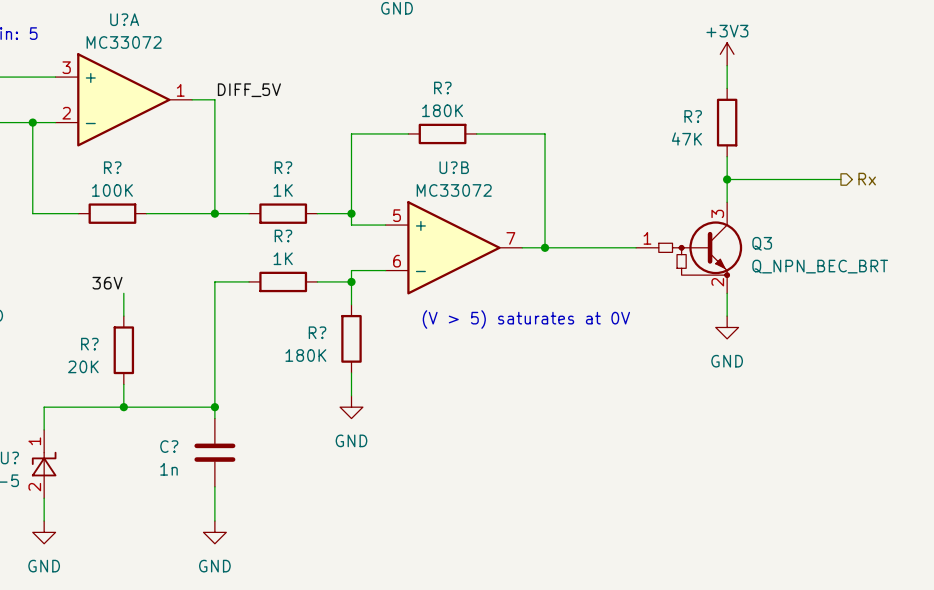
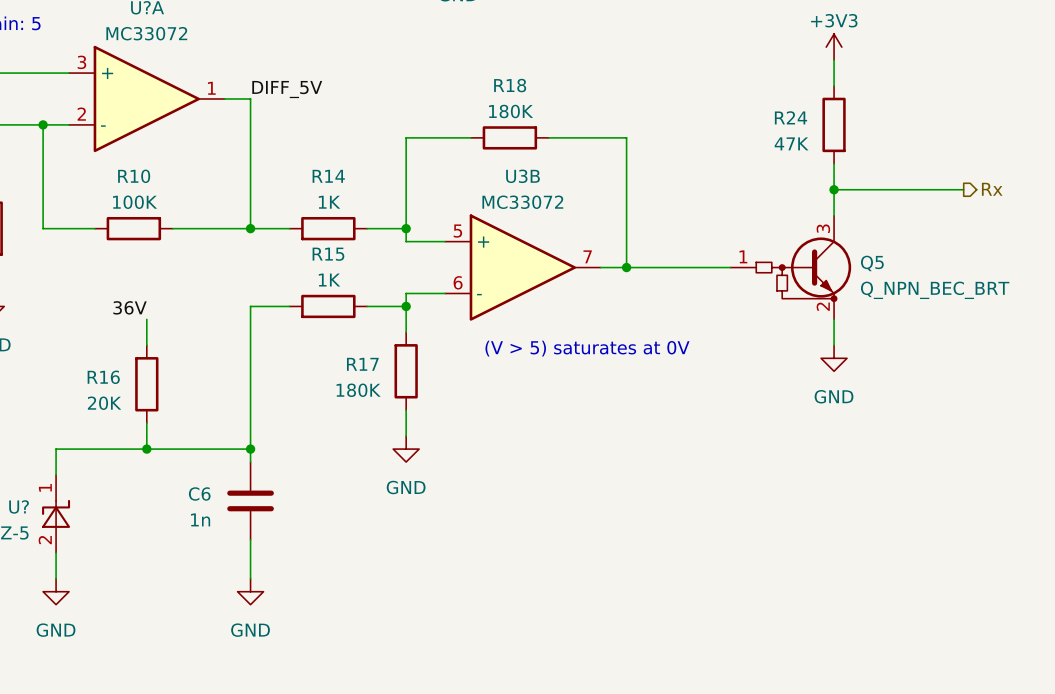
R? name: R? (442, 88) -> R18 (510, 85)
R? name: R? (693, 116) -> R24 (790, 117)
R? name: R? (112, 167) -> R10 (134, 176)
R? name: R? (283, 167) -> R14 (328, 176)
U?B name: U?B (454, 167) -> U3B (522, 176)
R? name: R? (283, 235) -> R15 (328, 254)
Q3 name: Q3 (762, 243) -> Q5 (872, 263)
R? name: R? (317, 332) -> R17 (362, 364)
R? name: R? (89, 344) -> R16 (103, 377)
C? name: C? (169, 446) -> C6 (199, 493)

